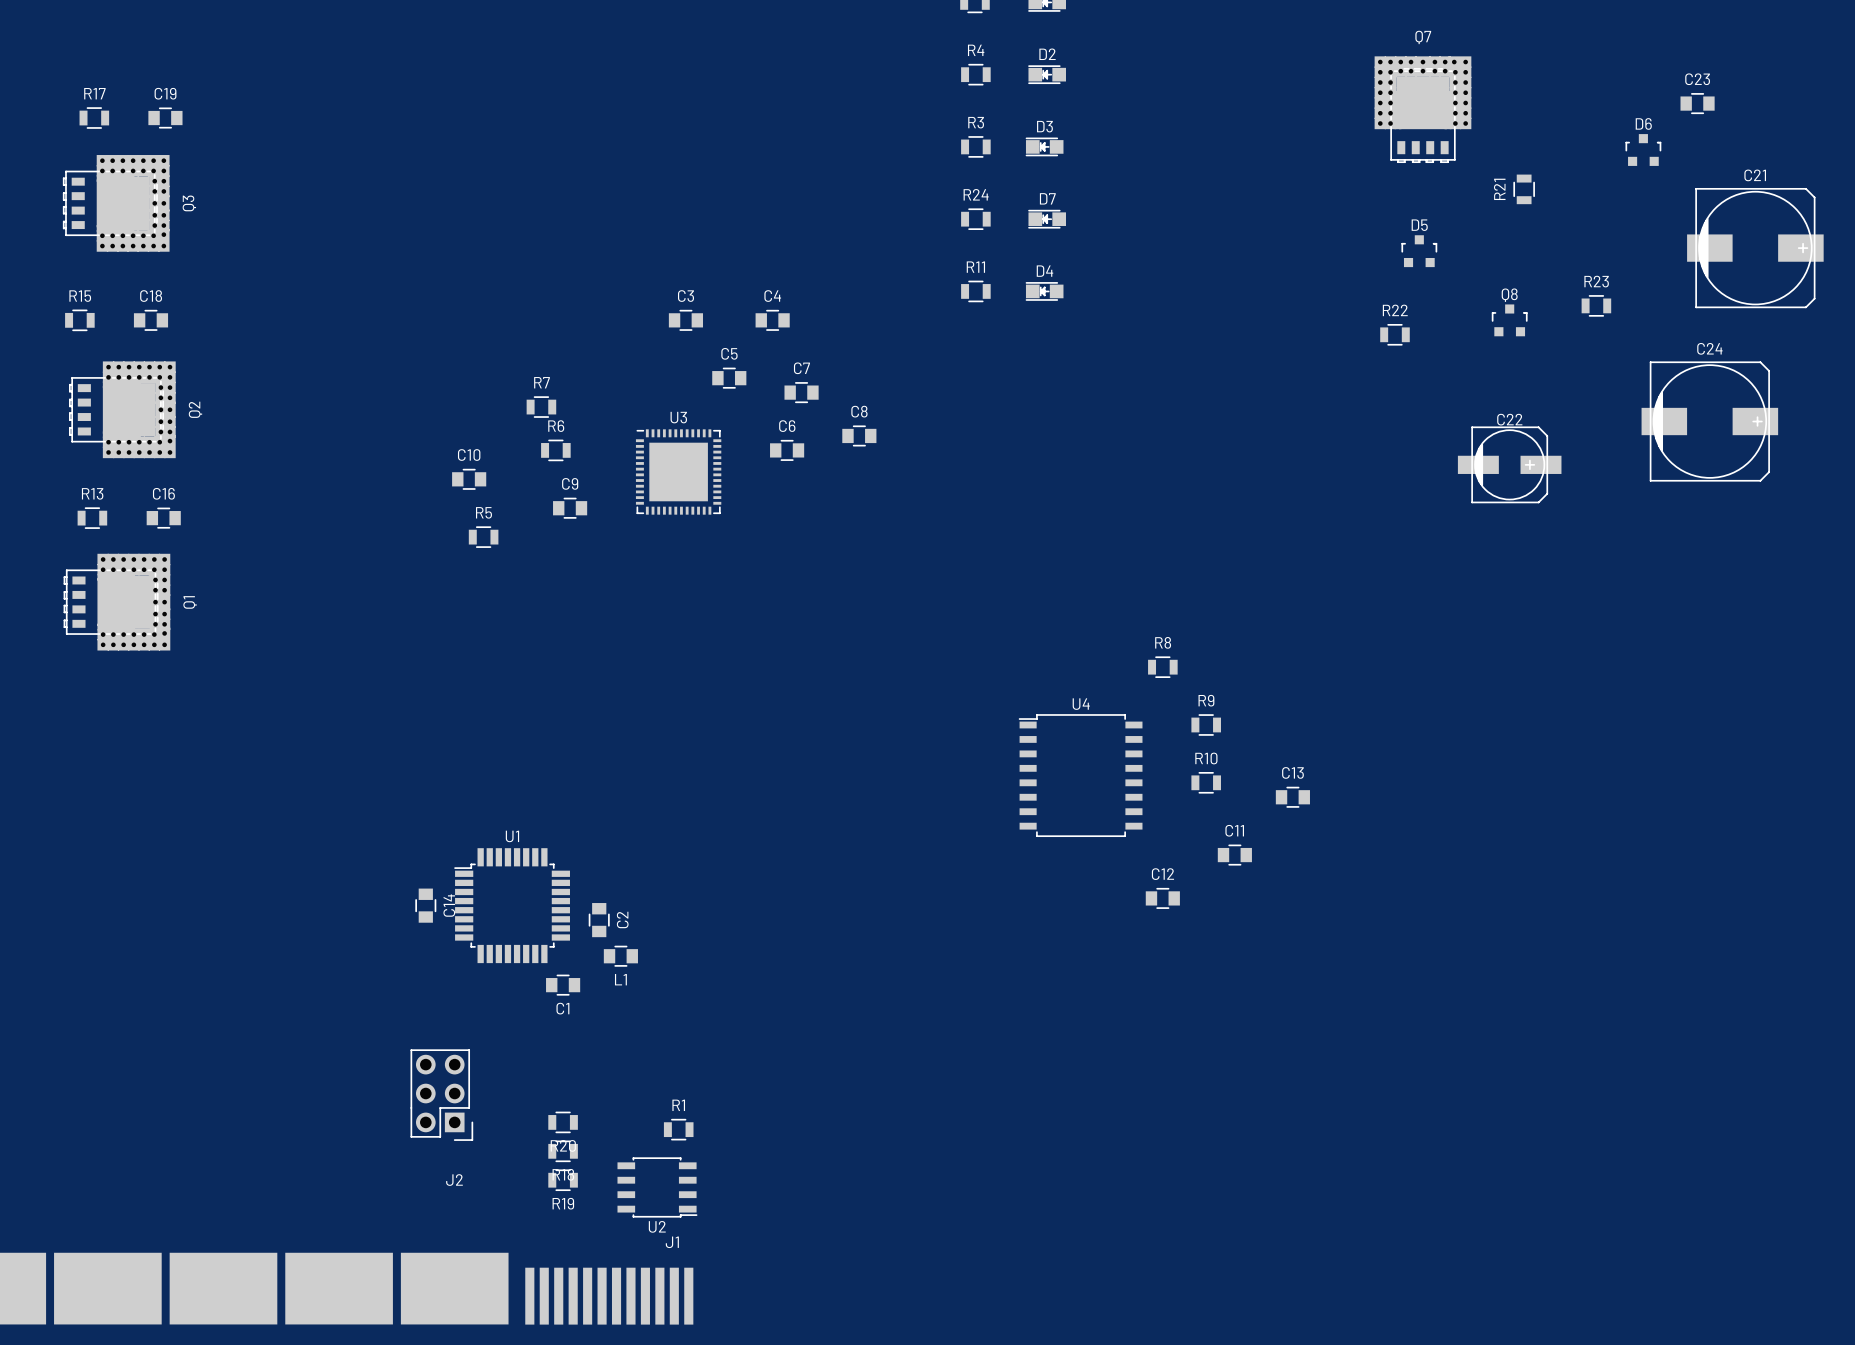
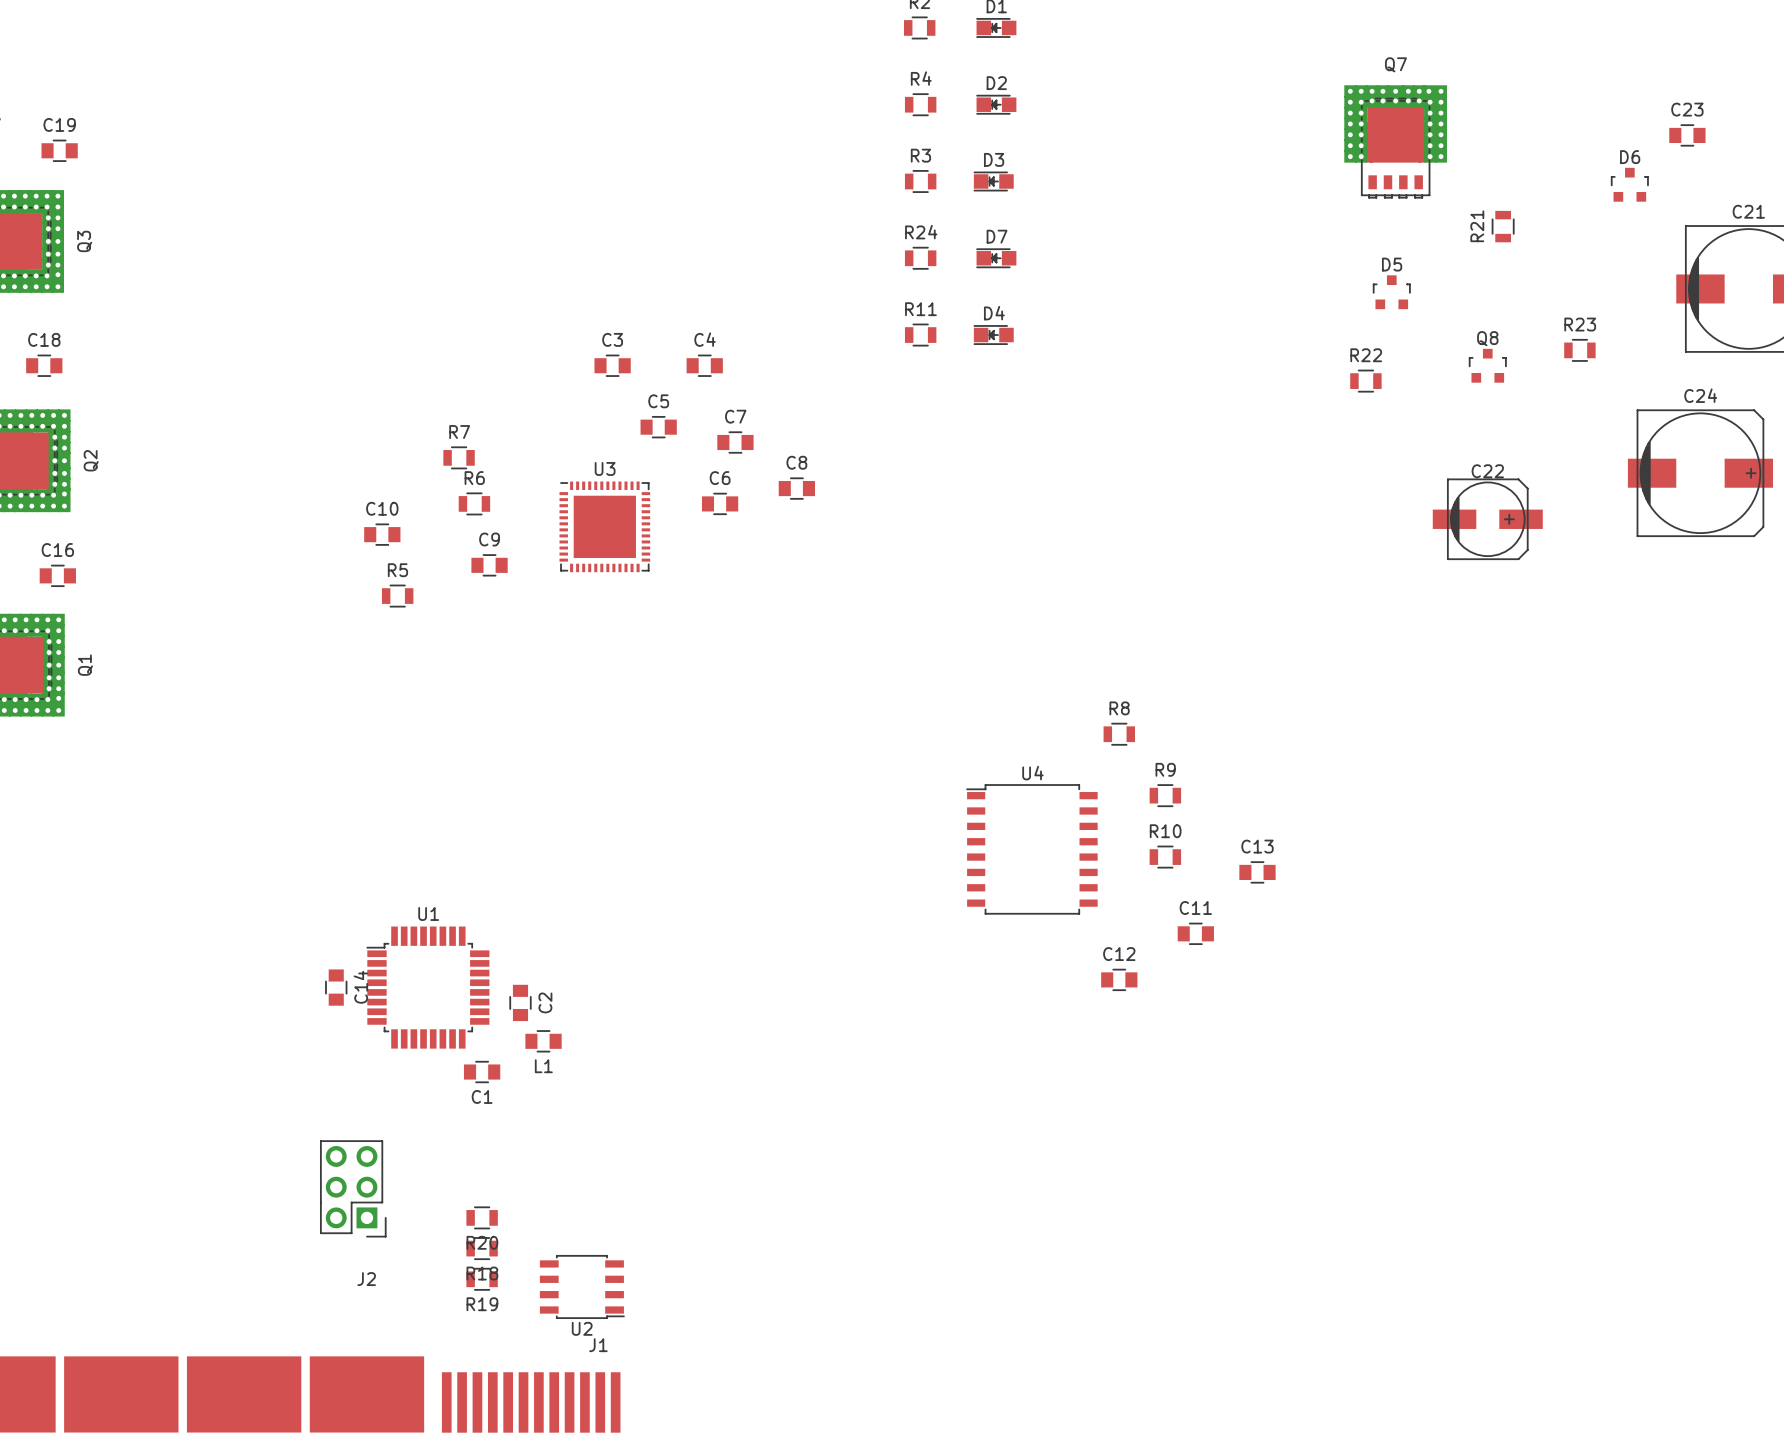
R1: (678, 1129) -> none

